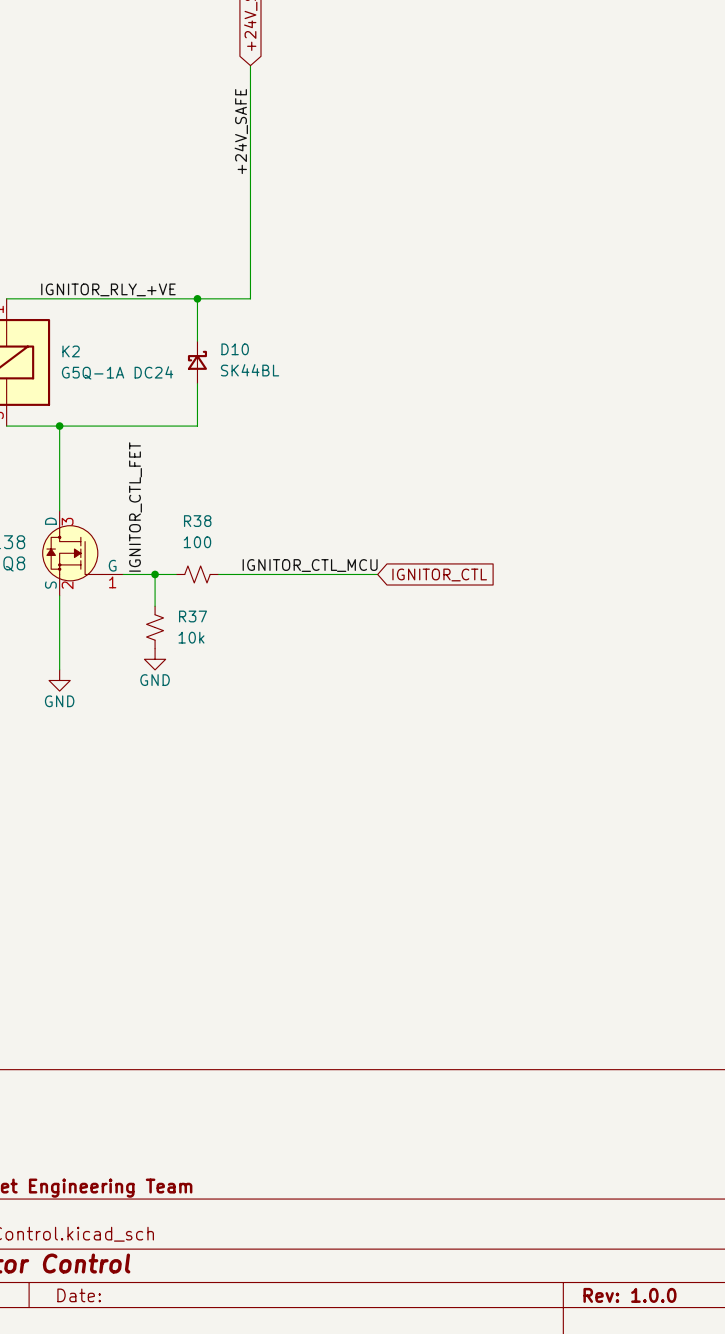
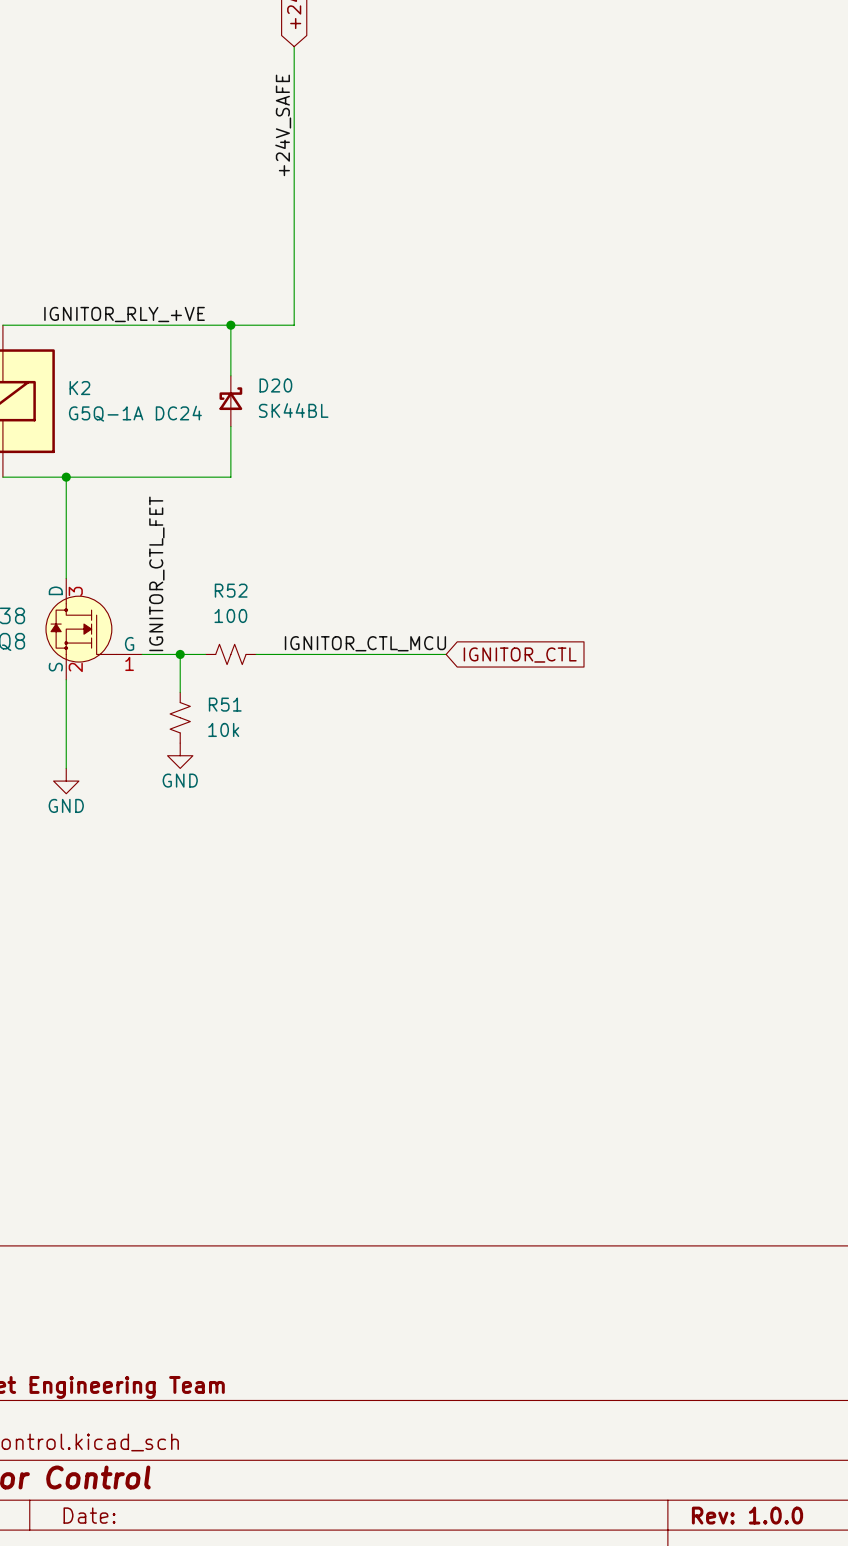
D10 name: D10 (235, 349) -> D20 (275, 385)
R38 name: R38 (197, 521) -> R52 (231, 590)
R37 name: R37 (193, 616) -> R51 (225, 704)

